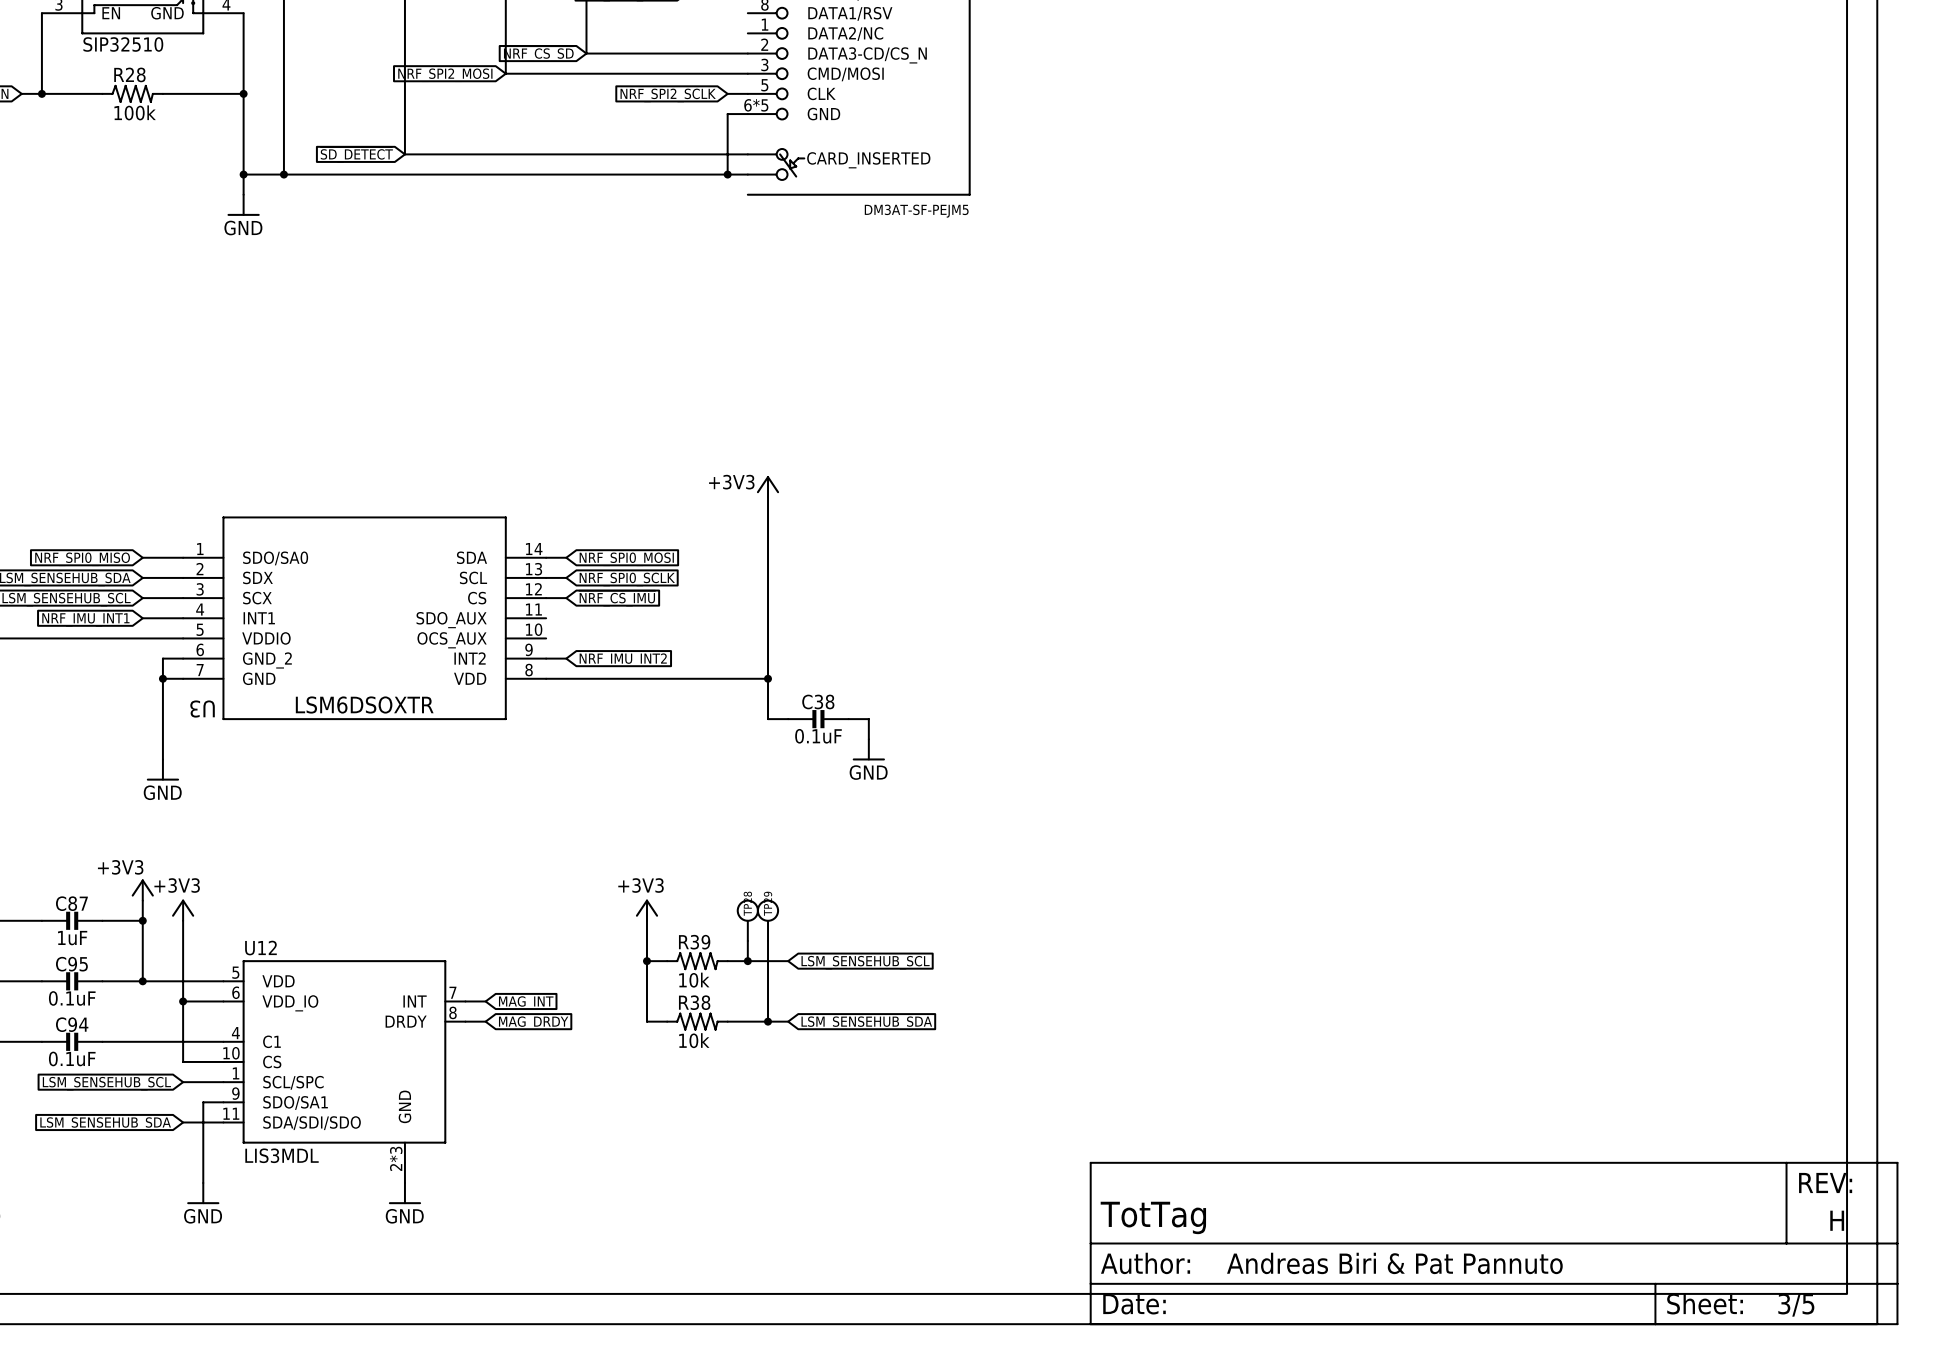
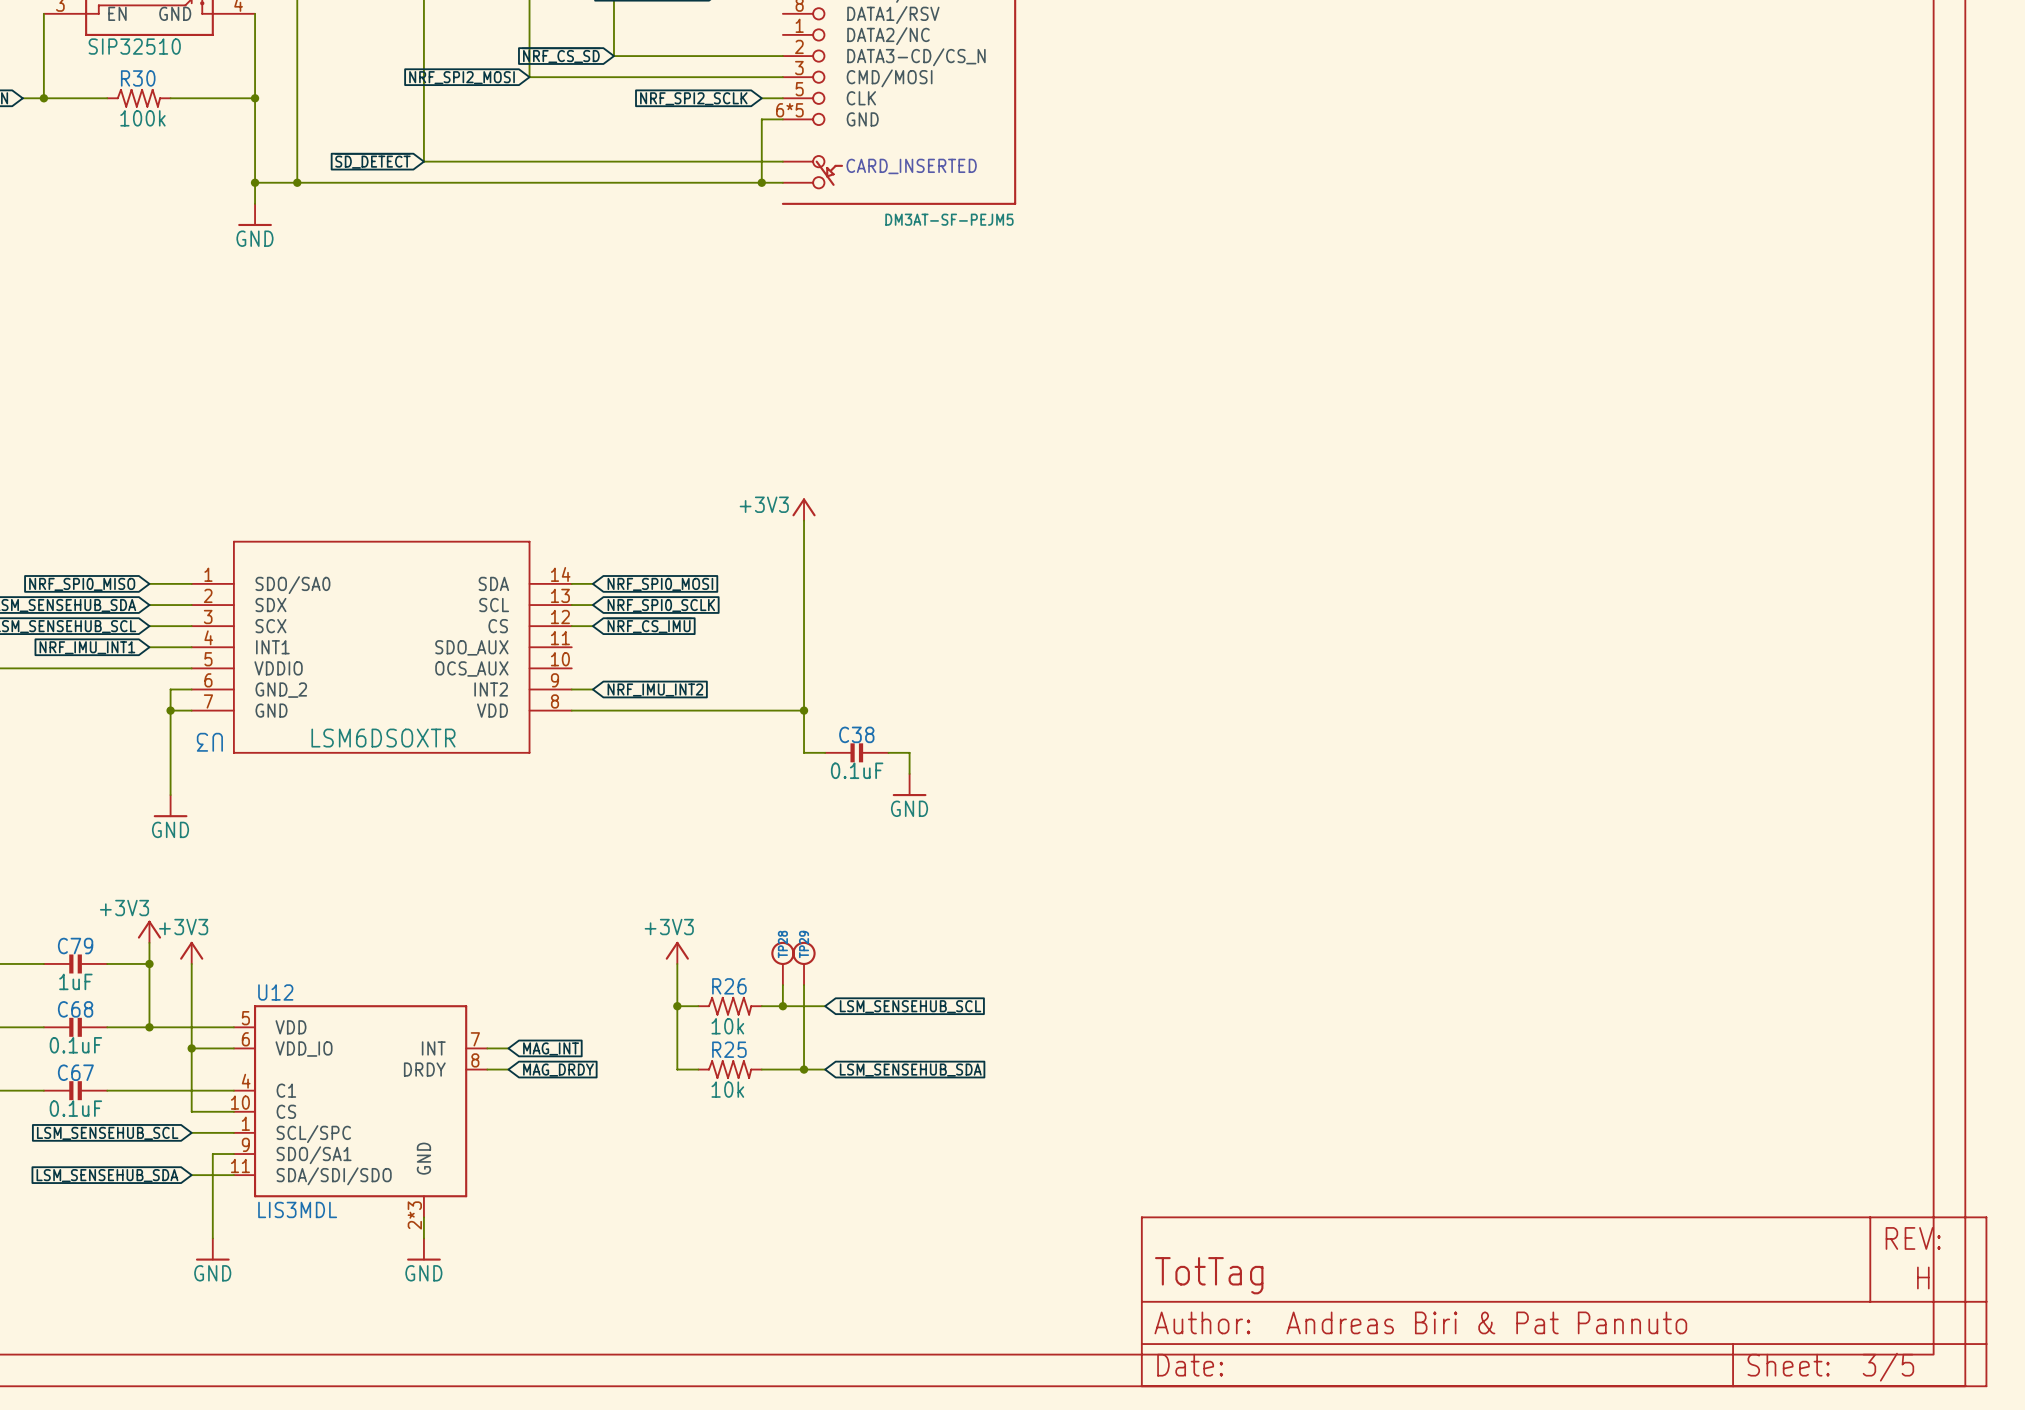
R28 name: R28 (129, 74) -> R30 (138, 78)
C87 name: C87 (71, 903) -> C79 (75, 946)
R39 name: R39 (694, 942) -> R26 (729, 986)
C95 name: C95 (71, 964) -> C68 (75, 1009)
R38 name: R38 (694, 1002) -> R25 (729, 1049)
C94 name: C94 (72, 1024) -> C67 (75, 1072)

